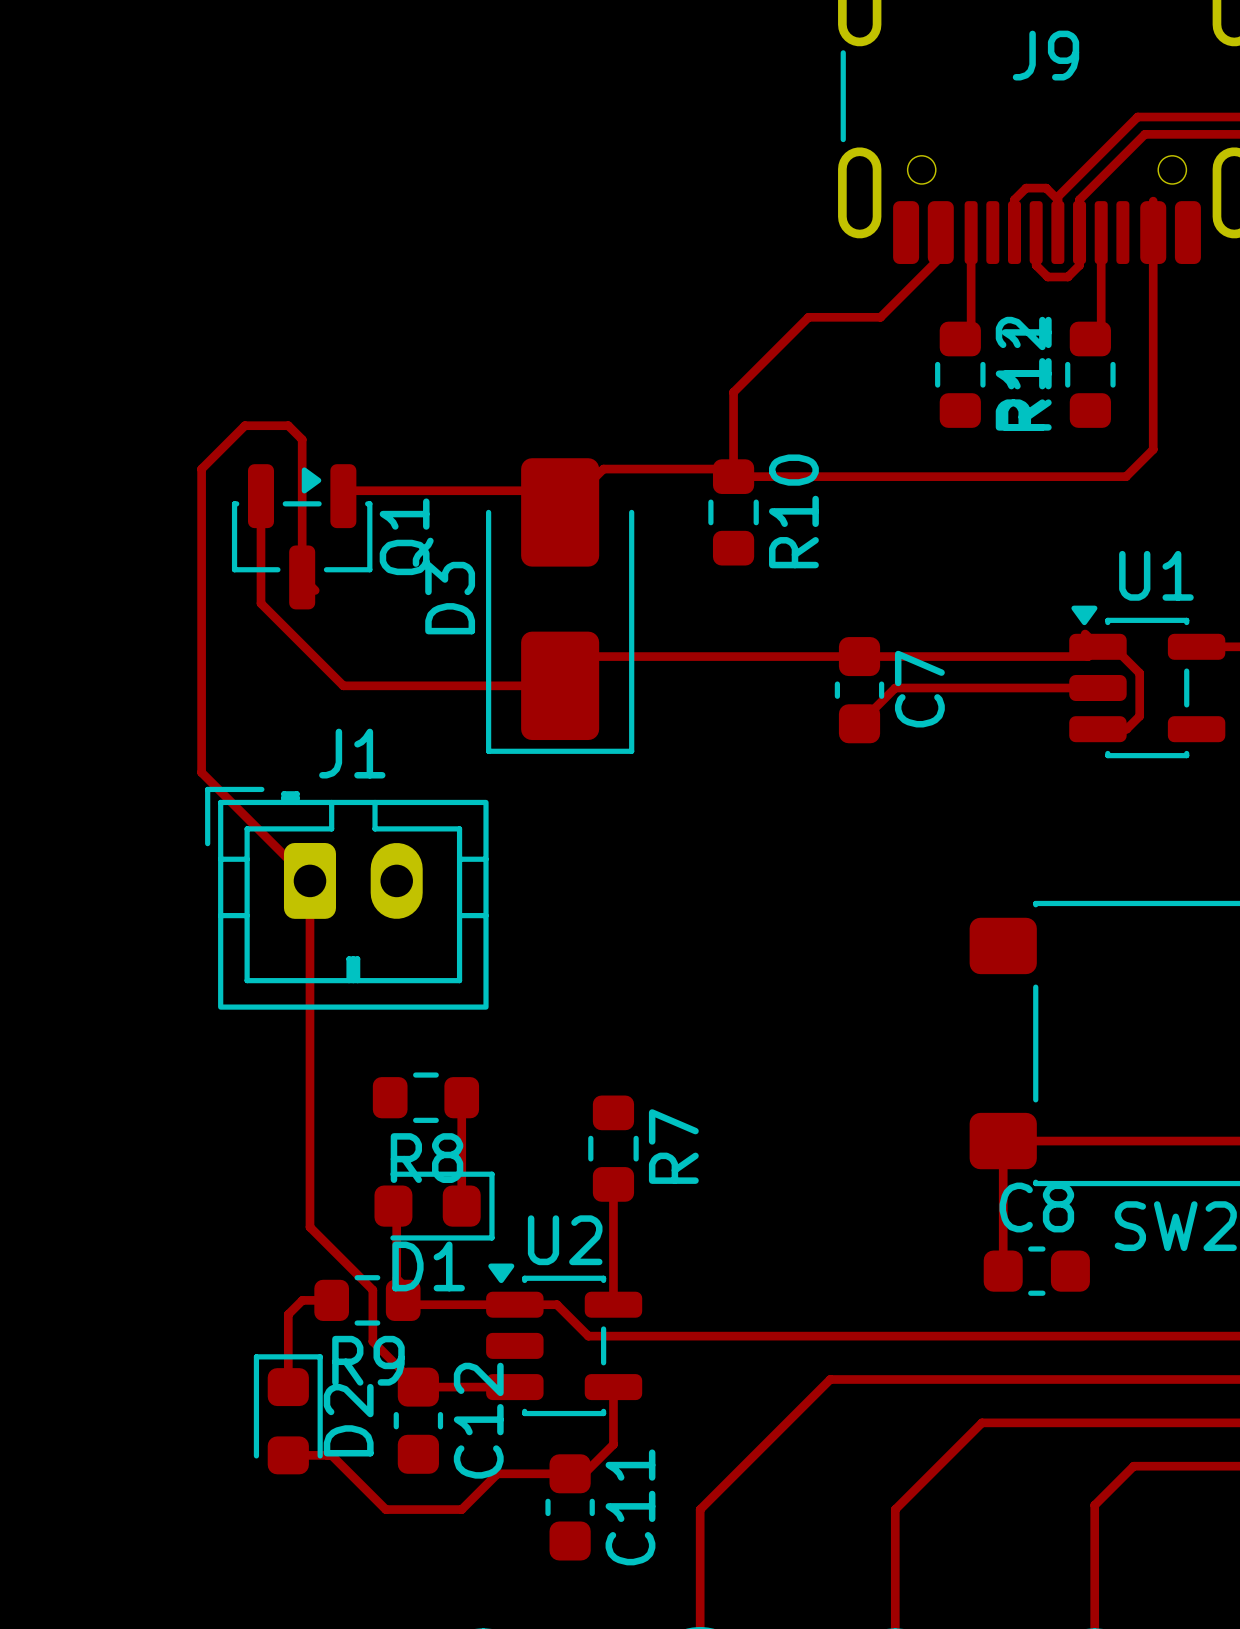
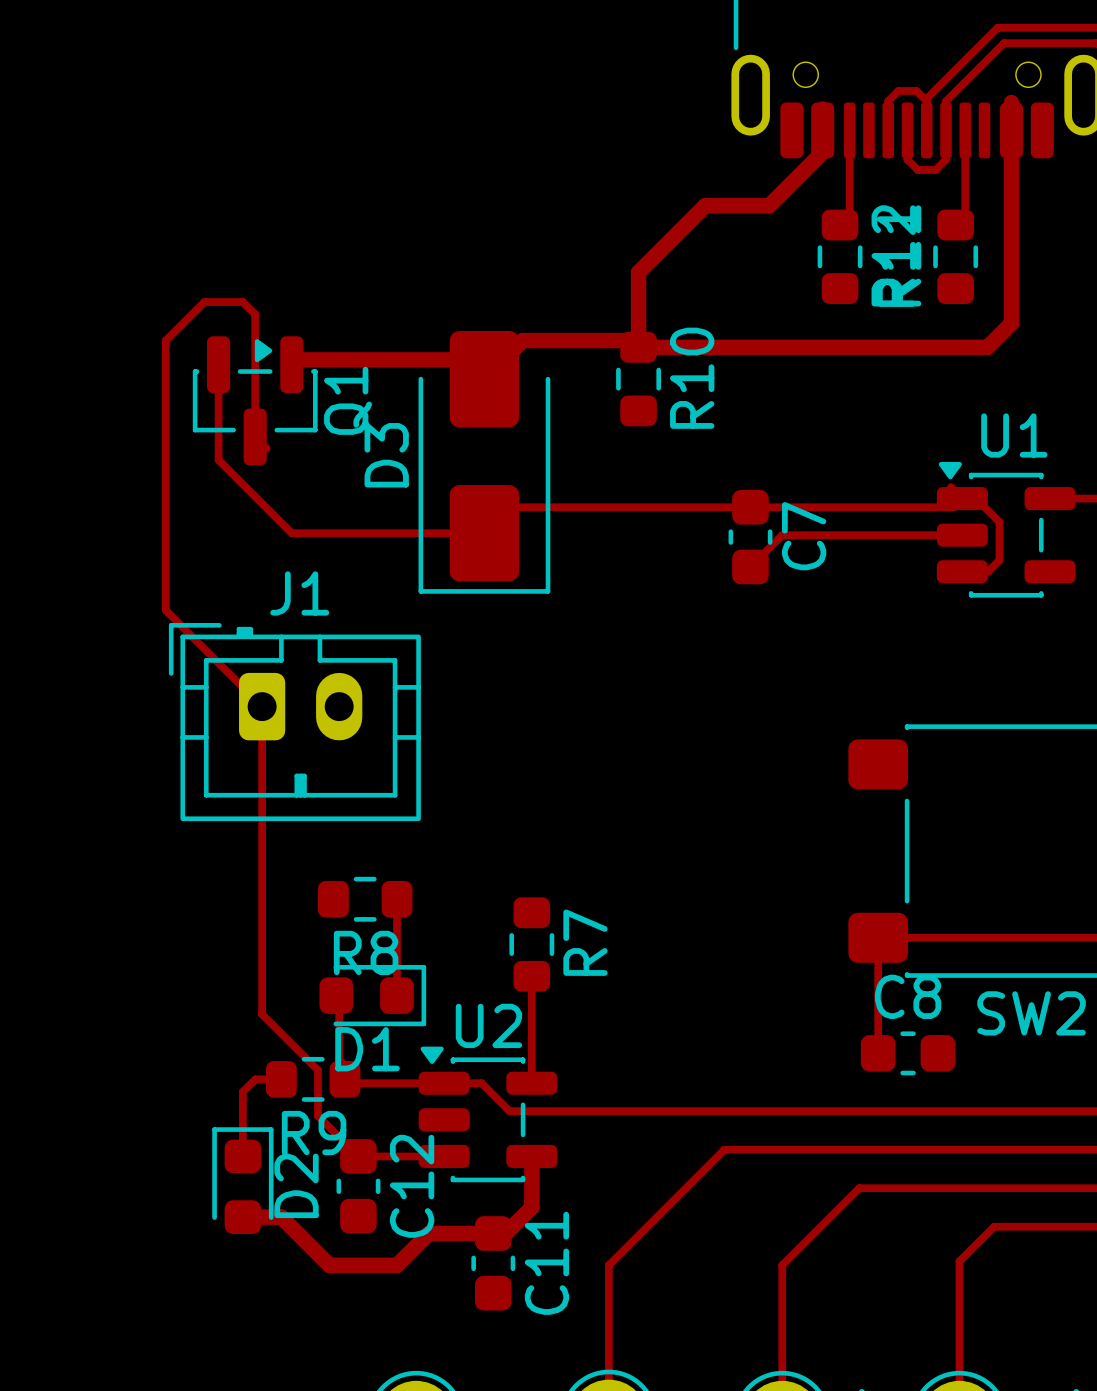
track width: thin (1153, 201) (1153, 449) (1126, 476) (733, 476) -> thick (1011, 102) (1011, 323) (987, 347) (638, 347)
track width: thin (940, 208) (940, 257) (880, 317) (808, 317) (733, 392) (733, 476) -> thick (822, 108) (822, 152) (769, 205) (705, 205) (638, 272) (638, 347)
track width: thin (733, 476) (725, 469) (603, 469) (560, 512) (538, 490) (348, 490) (343, 496) -> thick (638, 347) (631, 340) (522, 340) (484, 379) (465, 359) (296, 359) (291, 364)
track width: thin (613, 1387) (613, 1444) (584, 1473) (497, 1473) (461, 1509) (385, 1509) (331, 1455) (288, 1455) -> thick (531, 1156) (531, 1207) (505, 1233) (428, 1233) (396, 1265) (329, 1265) (281, 1217) (242, 1217)

